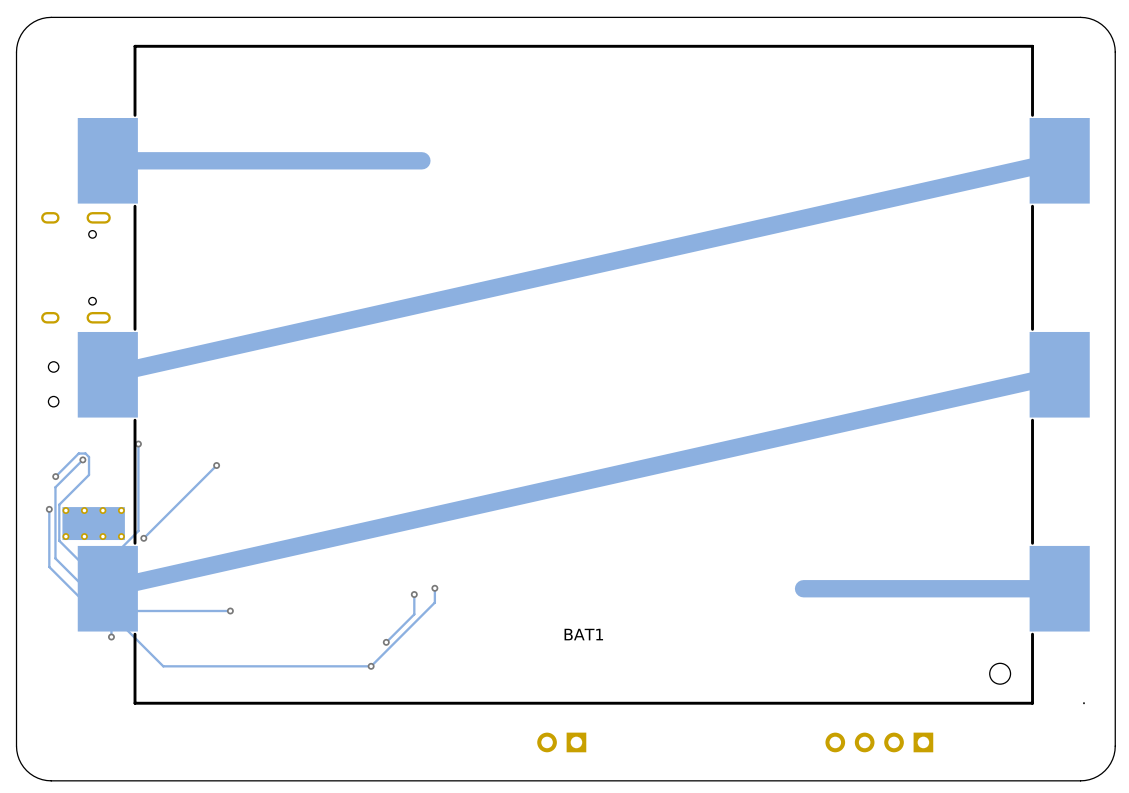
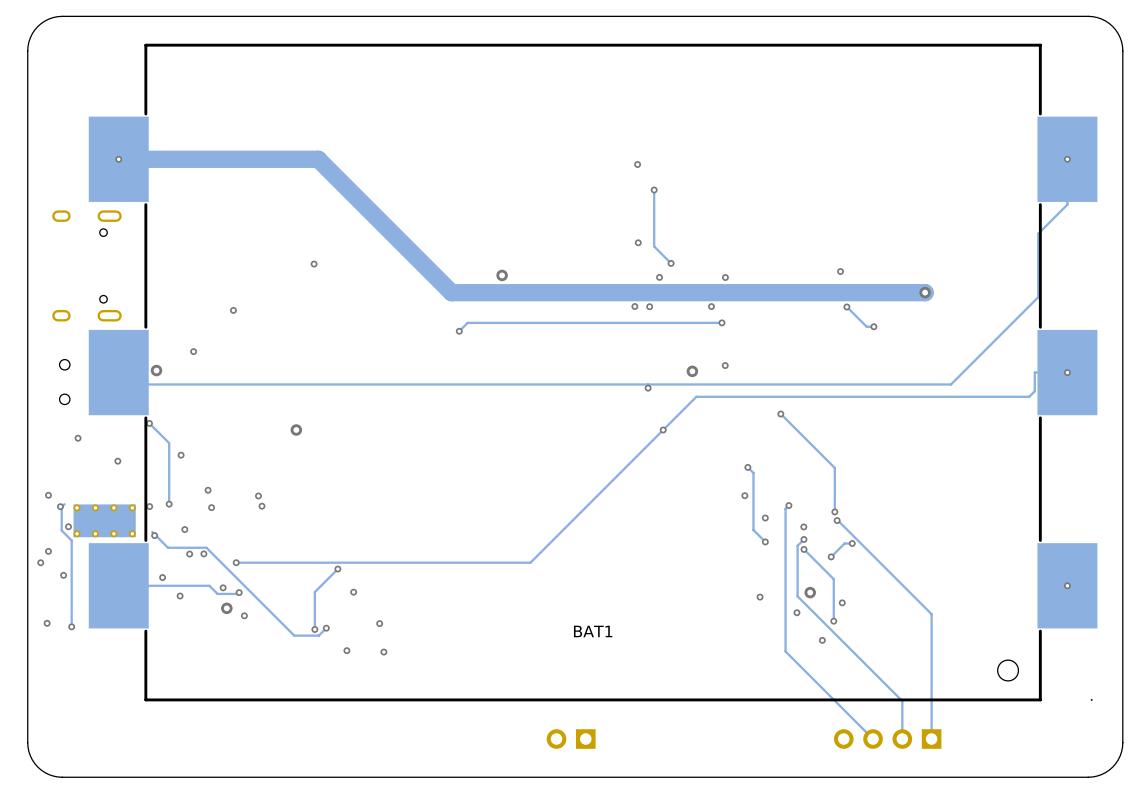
via: none -> (118, 159)
track: (421, 160) (307, 160) -> (925, 292) (451, 292) (318, 159)
track: (1059, 160) (107, 374) -> (1067, 159) (1067, 204) (1038, 233) (1038, 297) (951, 384) (130, 384) (118, 372)
via: none -> (1067, 159)
via: none -> (637, 164)
track: none -> (654, 190) (654, 246) (671, 263)
via: none -> (654, 190)
via: none -> (638, 242)
via: none -> (314, 264)
via: none -> (671, 263)
via: none -> (840, 271)
via: none -> (502, 275)
via: none -> (659, 277)
via: none -> (725, 277)
via: none -> (925, 292)
via: none -> (634, 306)
via: none -> (649, 306)
via: none -> (711, 306)
track: none -> (846, 306) (866, 326) (873, 326)
via: none -> (846, 306)
via: none -> (233, 310)
track: none -> (721, 322) (467, 322) (459, 331)
via: none -> (721, 322)
via: none -> (873, 326)
via: none -> (459, 331)
via: none -> (193, 351)
via: none -> (725, 365)
via: none -> (156, 370)
via: none -> (692, 371)
track: (1059, 374) (107, 588) -> (1067, 372) (1034, 372) (1034, 391) (1029, 396) (696, 396) (530, 562) (236, 562)
via: none -> (1067, 372)
via: none -> (648, 388)
track: none -> (780, 413) (834, 468) (834, 511)
via: none -> (780, 413)
track: none -> (149, 423) (169, 443) (169, 504)
via: none -> (149, 423)
via: none -> (296, 429)
via: none -> (663, 430)
via: none -> (78, 438)
track: (138, 444) (138, 531) (93, 575) -> none
via: (138, 444) -> none
via: none -> (181, 455)
track: (82, 459) (55, 487) (55, 558) (163, 666) (371, 666) (434, 602) (434, 588) -> none
via: (82, 459) -> none
via: none -> (117, 461)
track: (216, 465) (143, 538) -> none
via: (216, 465) -> none
track: none -> (747, 467) (753, 473) (753, 530) (765, 541)
via: none -> (747, 467)
track: (55, 476) (78, 453) (85, 453) (89, 457) (89, 474) (59, 504) (59, 540) (95, 577) (95, 593) (113, 611) (230, 611) -> none
via: (55, 476) -> none
via: none -> (208, 490)
via: none -> (48, 495)
via: none -> (258, 495)
via: none -> (744, 495)
track: none -> (64, 504) (61, 507) (61, 530) (71, 540) (71, 626)
via: none -> (169, 504)
via: none -> (261, 506)
track: none -> (788, 505) (785, 508) (785, 651) (873, 739)
via: none -> (788, 505)
track: (49, 509) (49, 566) (111, 629) (111, 637) -> none
via: none -> (149, 506)
via: none -> (211, 507)
via: none -> (834, 511)
via: none -> (765, 518)
track: none -> (837, 520) (931, 614) (931, 739)
via: none -> (837, 520)
via: none -> (68, 526)
via: none -> (803, 526)
via: none -> (184, 529)
track: none -> (152, 531) (168, 547) (206, 547) (294, 635) (318, 635) (326, 628)
track: none -> (803, 539) (797, 545) (797, 596) (902, 701) (902, 739)
via: none -> (803, 539)
via: none -> (765, 541)
track: none -> (852, 543) (844, 543) (831, 556)
via: none -> (852, 543)
track: none -> (804, 549) (833, 579) (833, 621)
via: none -> (804, 549)
via: none -> (48, 551)
via: none -> (189, 554)
via: none -> (203, 553)
via: none -> (831, 556)
via: none -> (40, 562)
via: none -> (236, 562)
track: none -> (337, 569) (314, 592) (314, 629)
via: none -> (337, 569)
via: none -> (63, 575)
via: none -> (162, 577)
track: none -> (118, 585) (209, 585) (217, 593) (239, 592)
via: (434, 588) -> none
track: (1059, 588) (803, 588) -> none
via: none -> (1067, 585)
via: none -> (223, 587)
track: (414, 594) (414, 614) (386, 642) -> none
via: (414, 594) -> none
via: none -> (239, 592)
via: none -> (353, 592)
via: none -> (810, 592)
via: none -> (180, 596)
via: none -> (760, 597)
via: none -> (842, 602)
via: none -> (226, 608)
via: (230, 611) -> none
via: none -> (796, 612)
via: none -> (244, 615)
via: none -> (833, 621)
via: none -> (47, 623)
via: none -> (379, 623)
via: none -> (71, 626)
via: none -> (326, 628)
via: none -> (314, 629)
via: (111, 637) -> none
via: (386, 642) -> none
via: none -> (822, 640)
via: none -> (346, 650)
via: none -> (383, 652)
via: (371, 666) -> none

